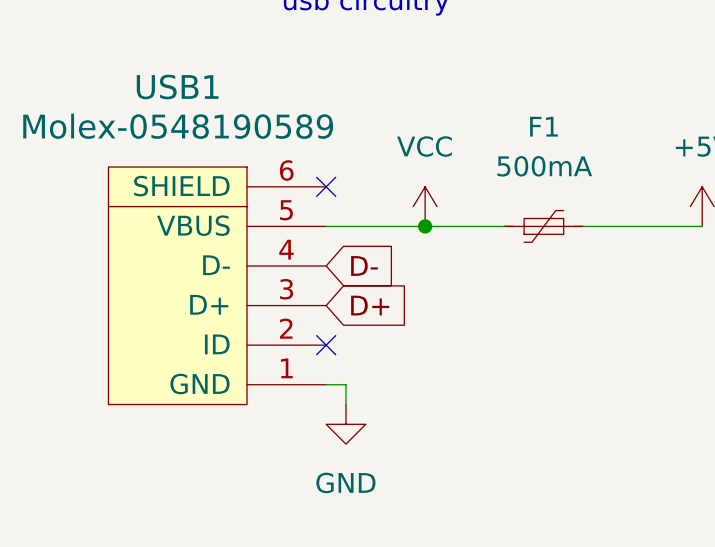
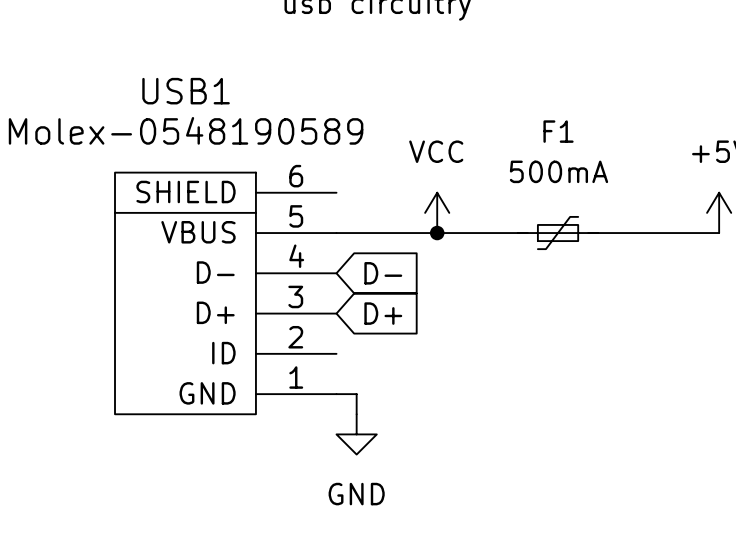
no-connect mark: (326, 186) -> none
no-connect mark: (326, 345) -> none

